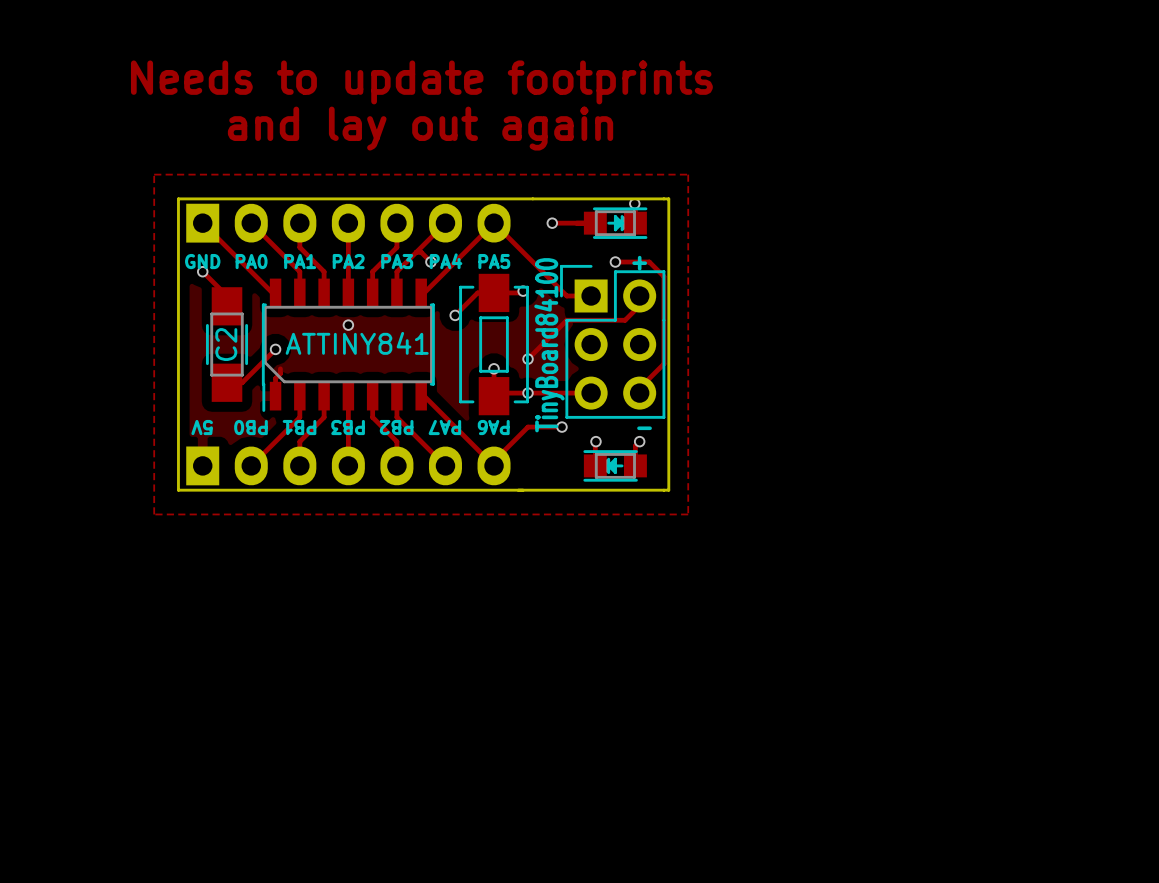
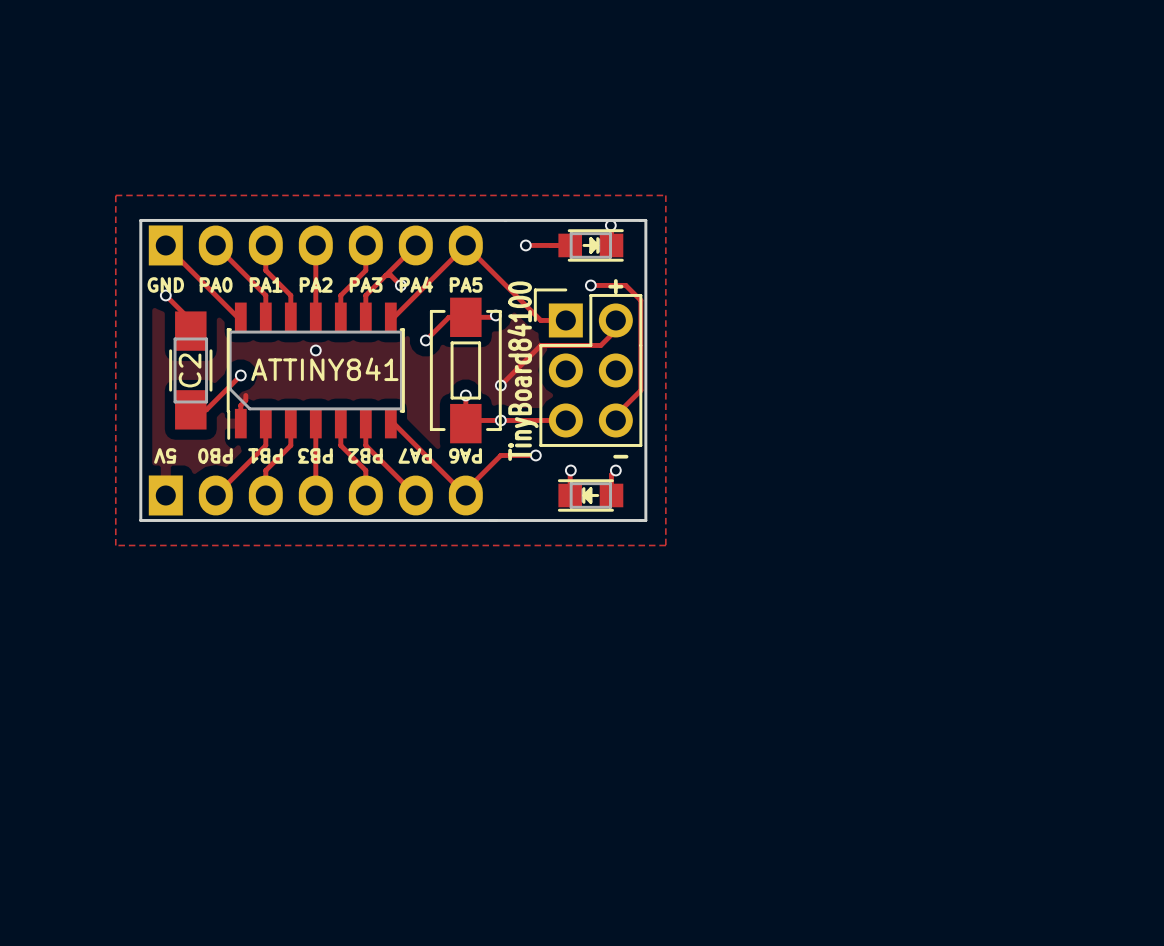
text: Needs to update footprints (421, 82) -> none
text: and lay out again (420, 128) -> none

